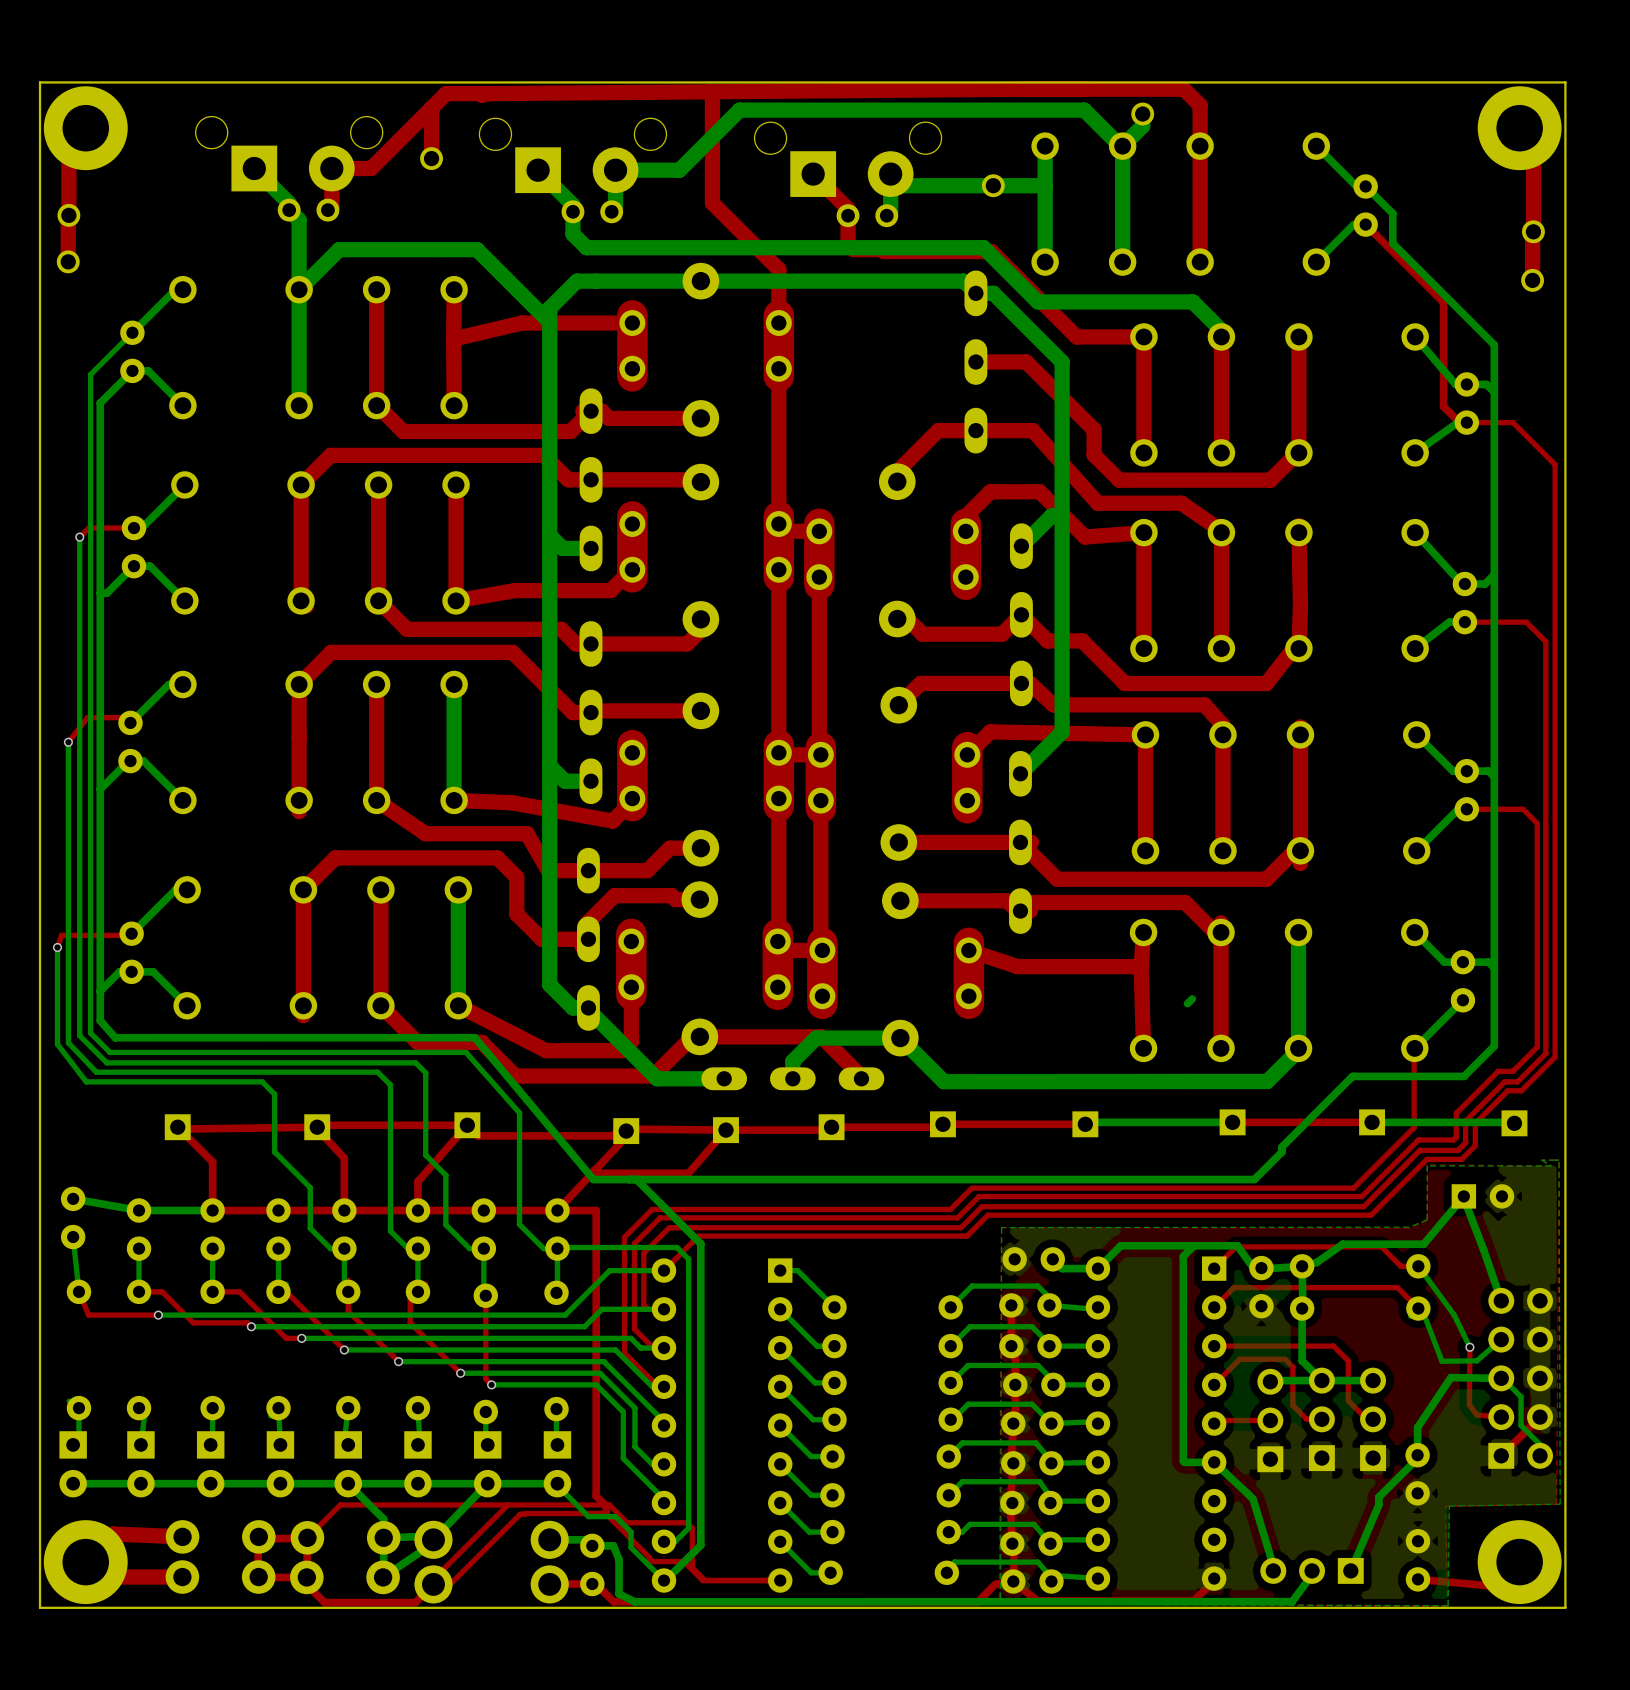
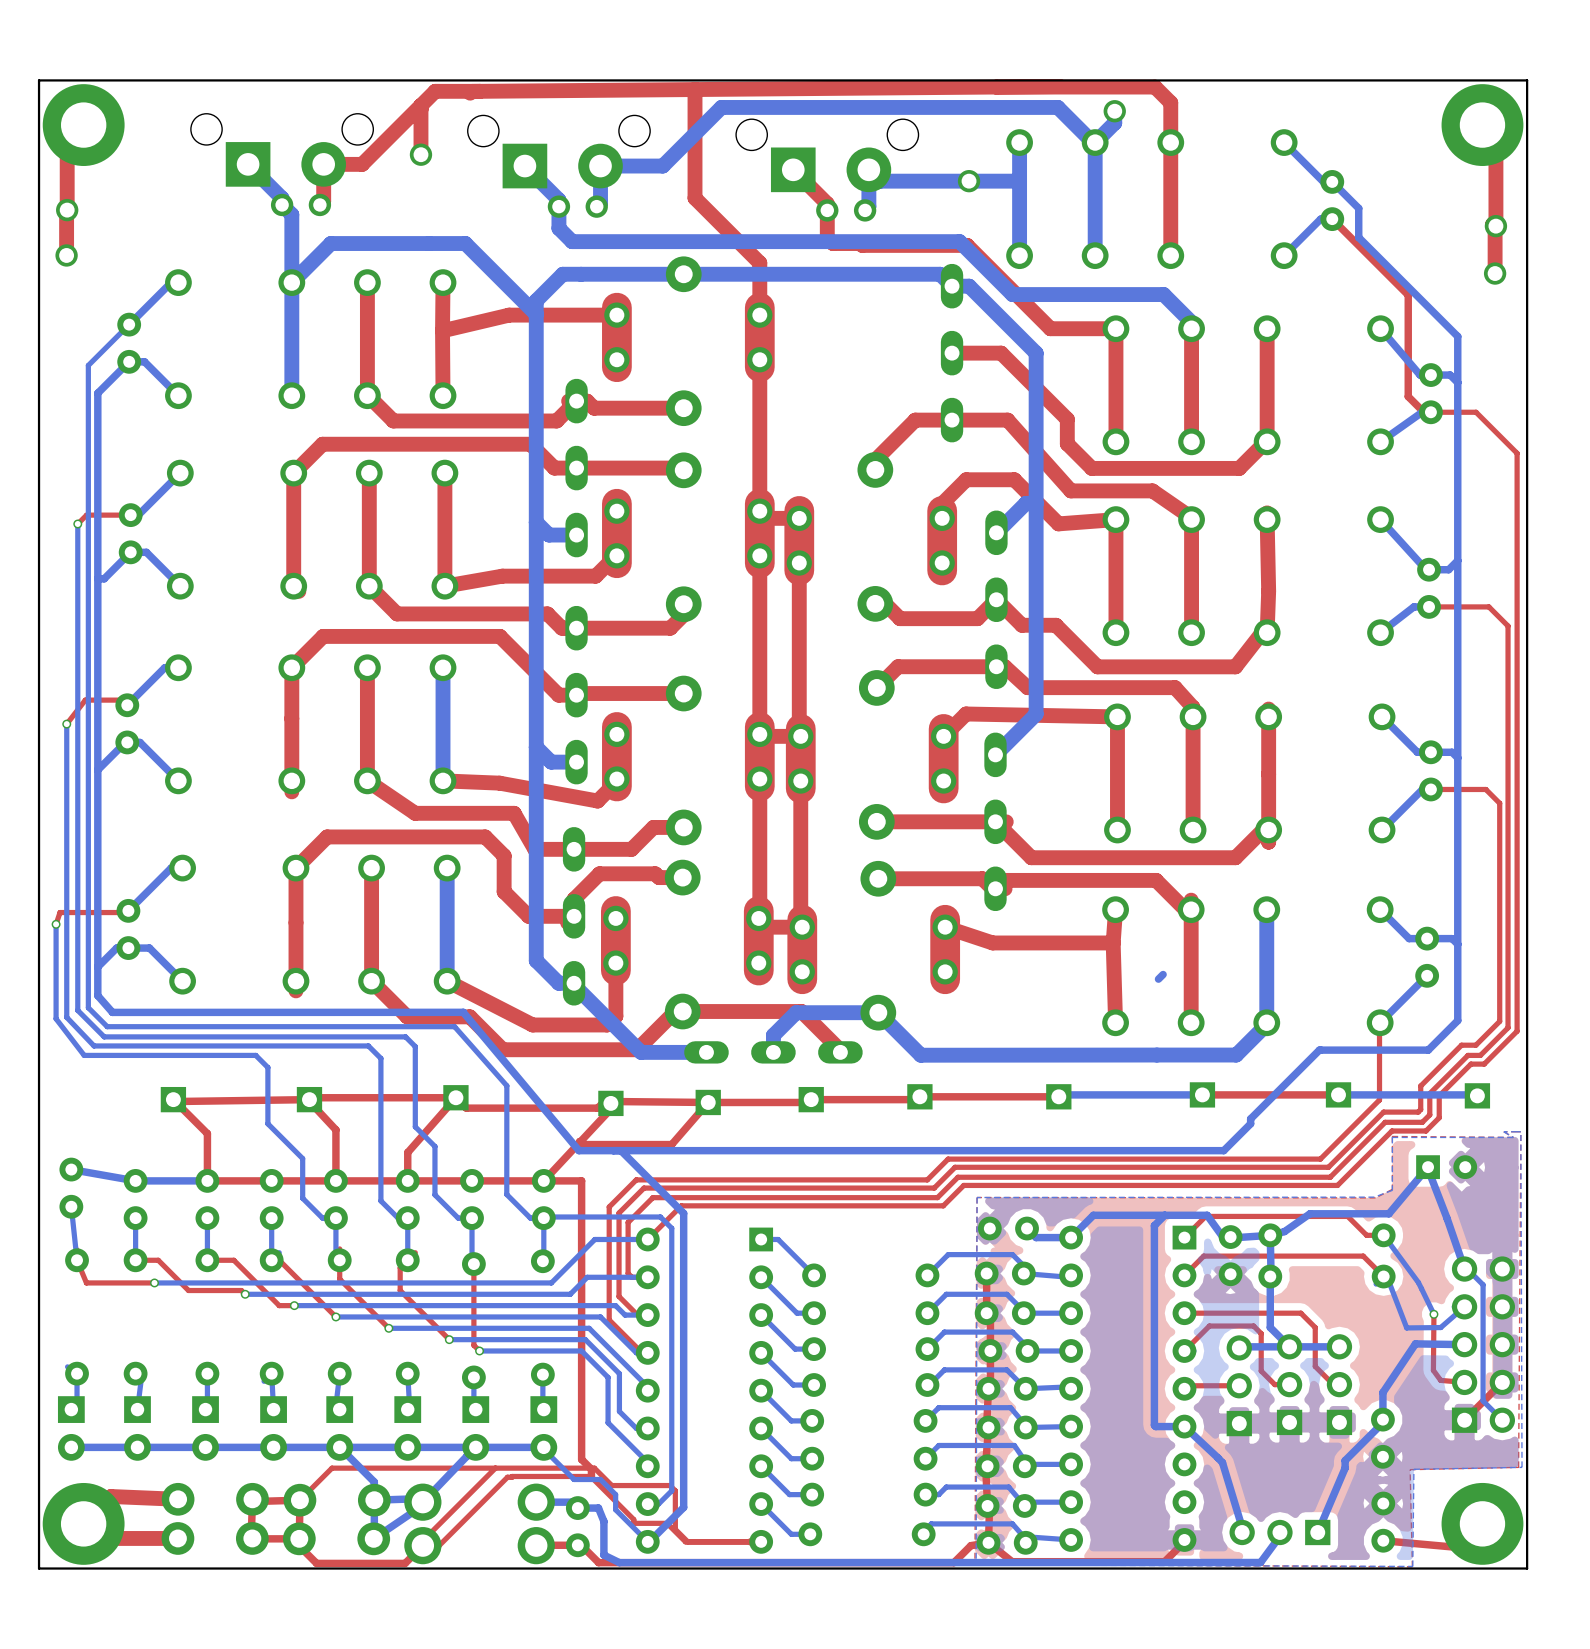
bottom track: none -> (1467, 1269) (1483, 1284) (1483, 1400) (1502, 1420)
bottom track: (1501, 1378) (1521, 1396) (1521, 1425) (1540, 1444) (1540, 1448) -> none

